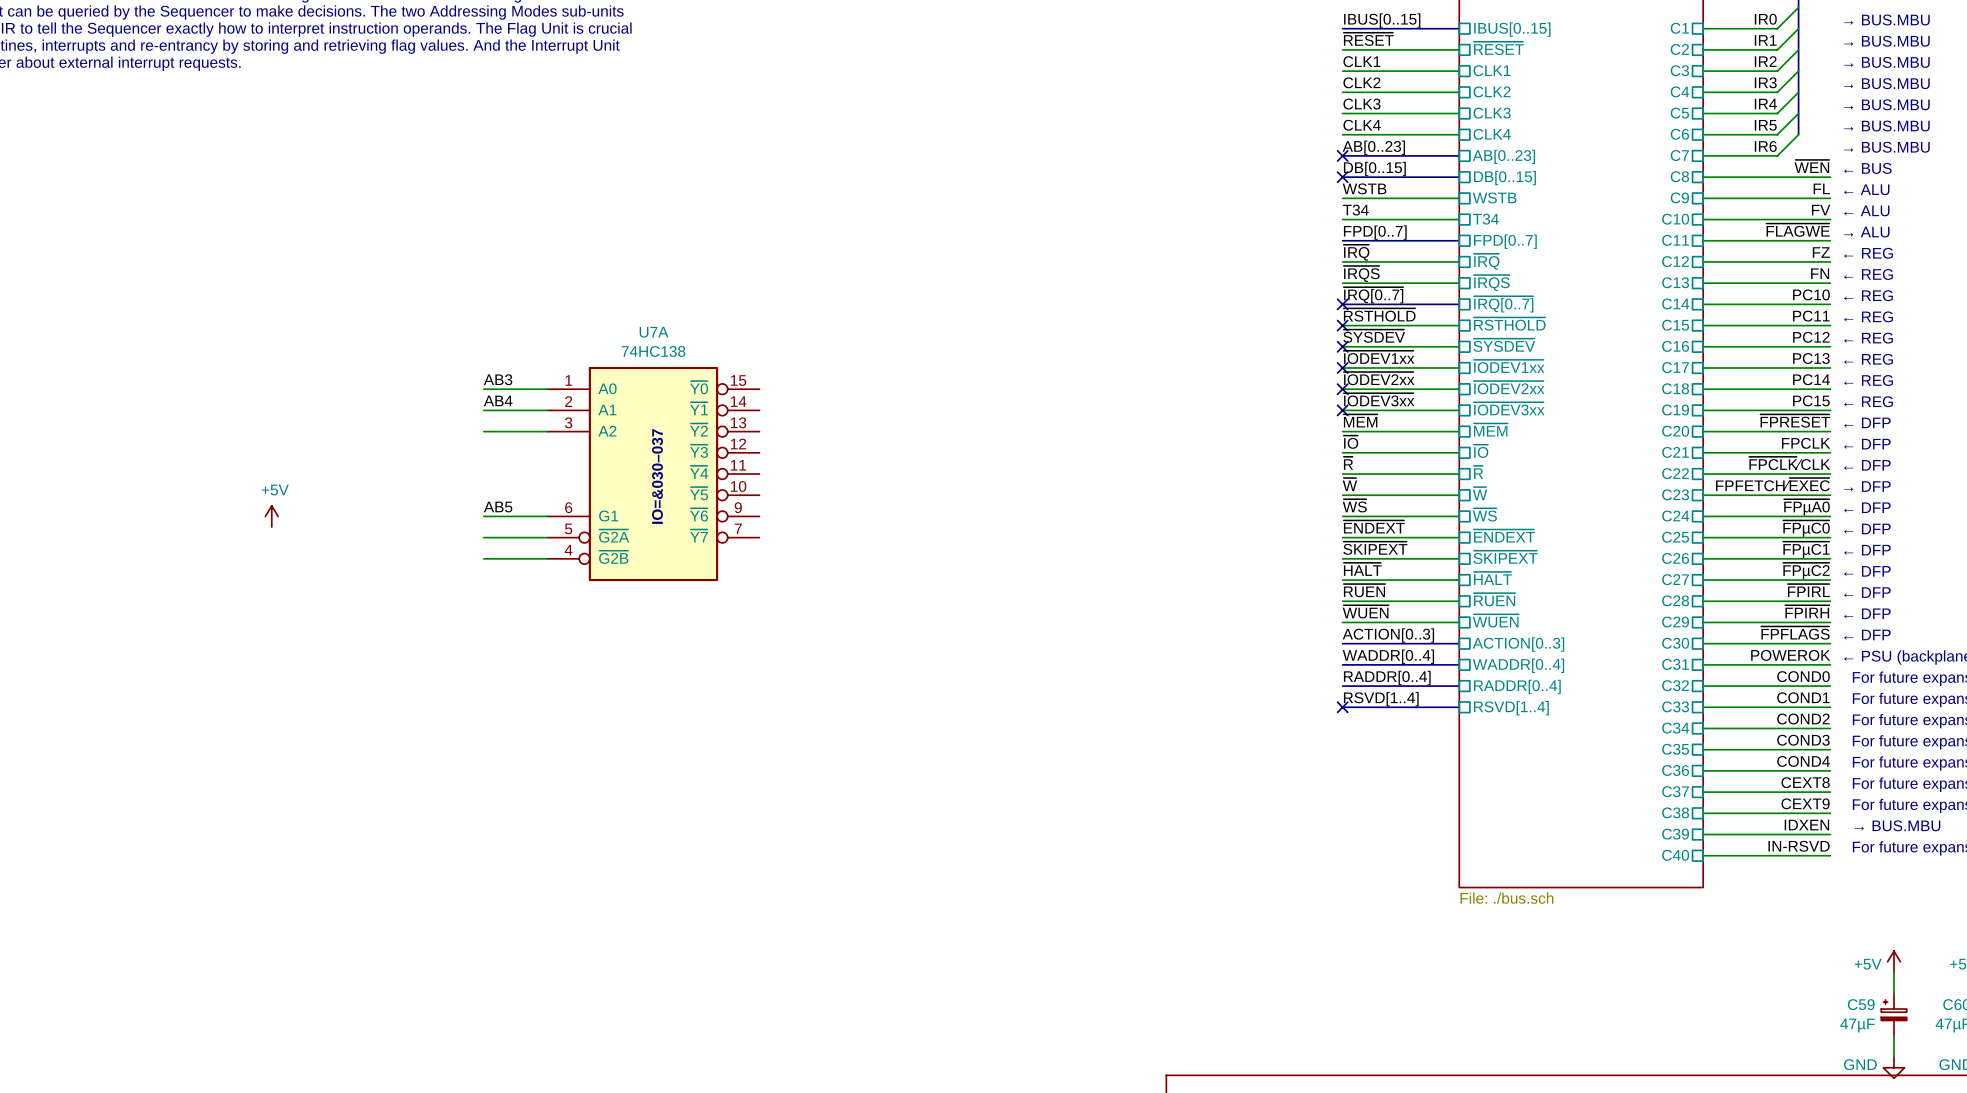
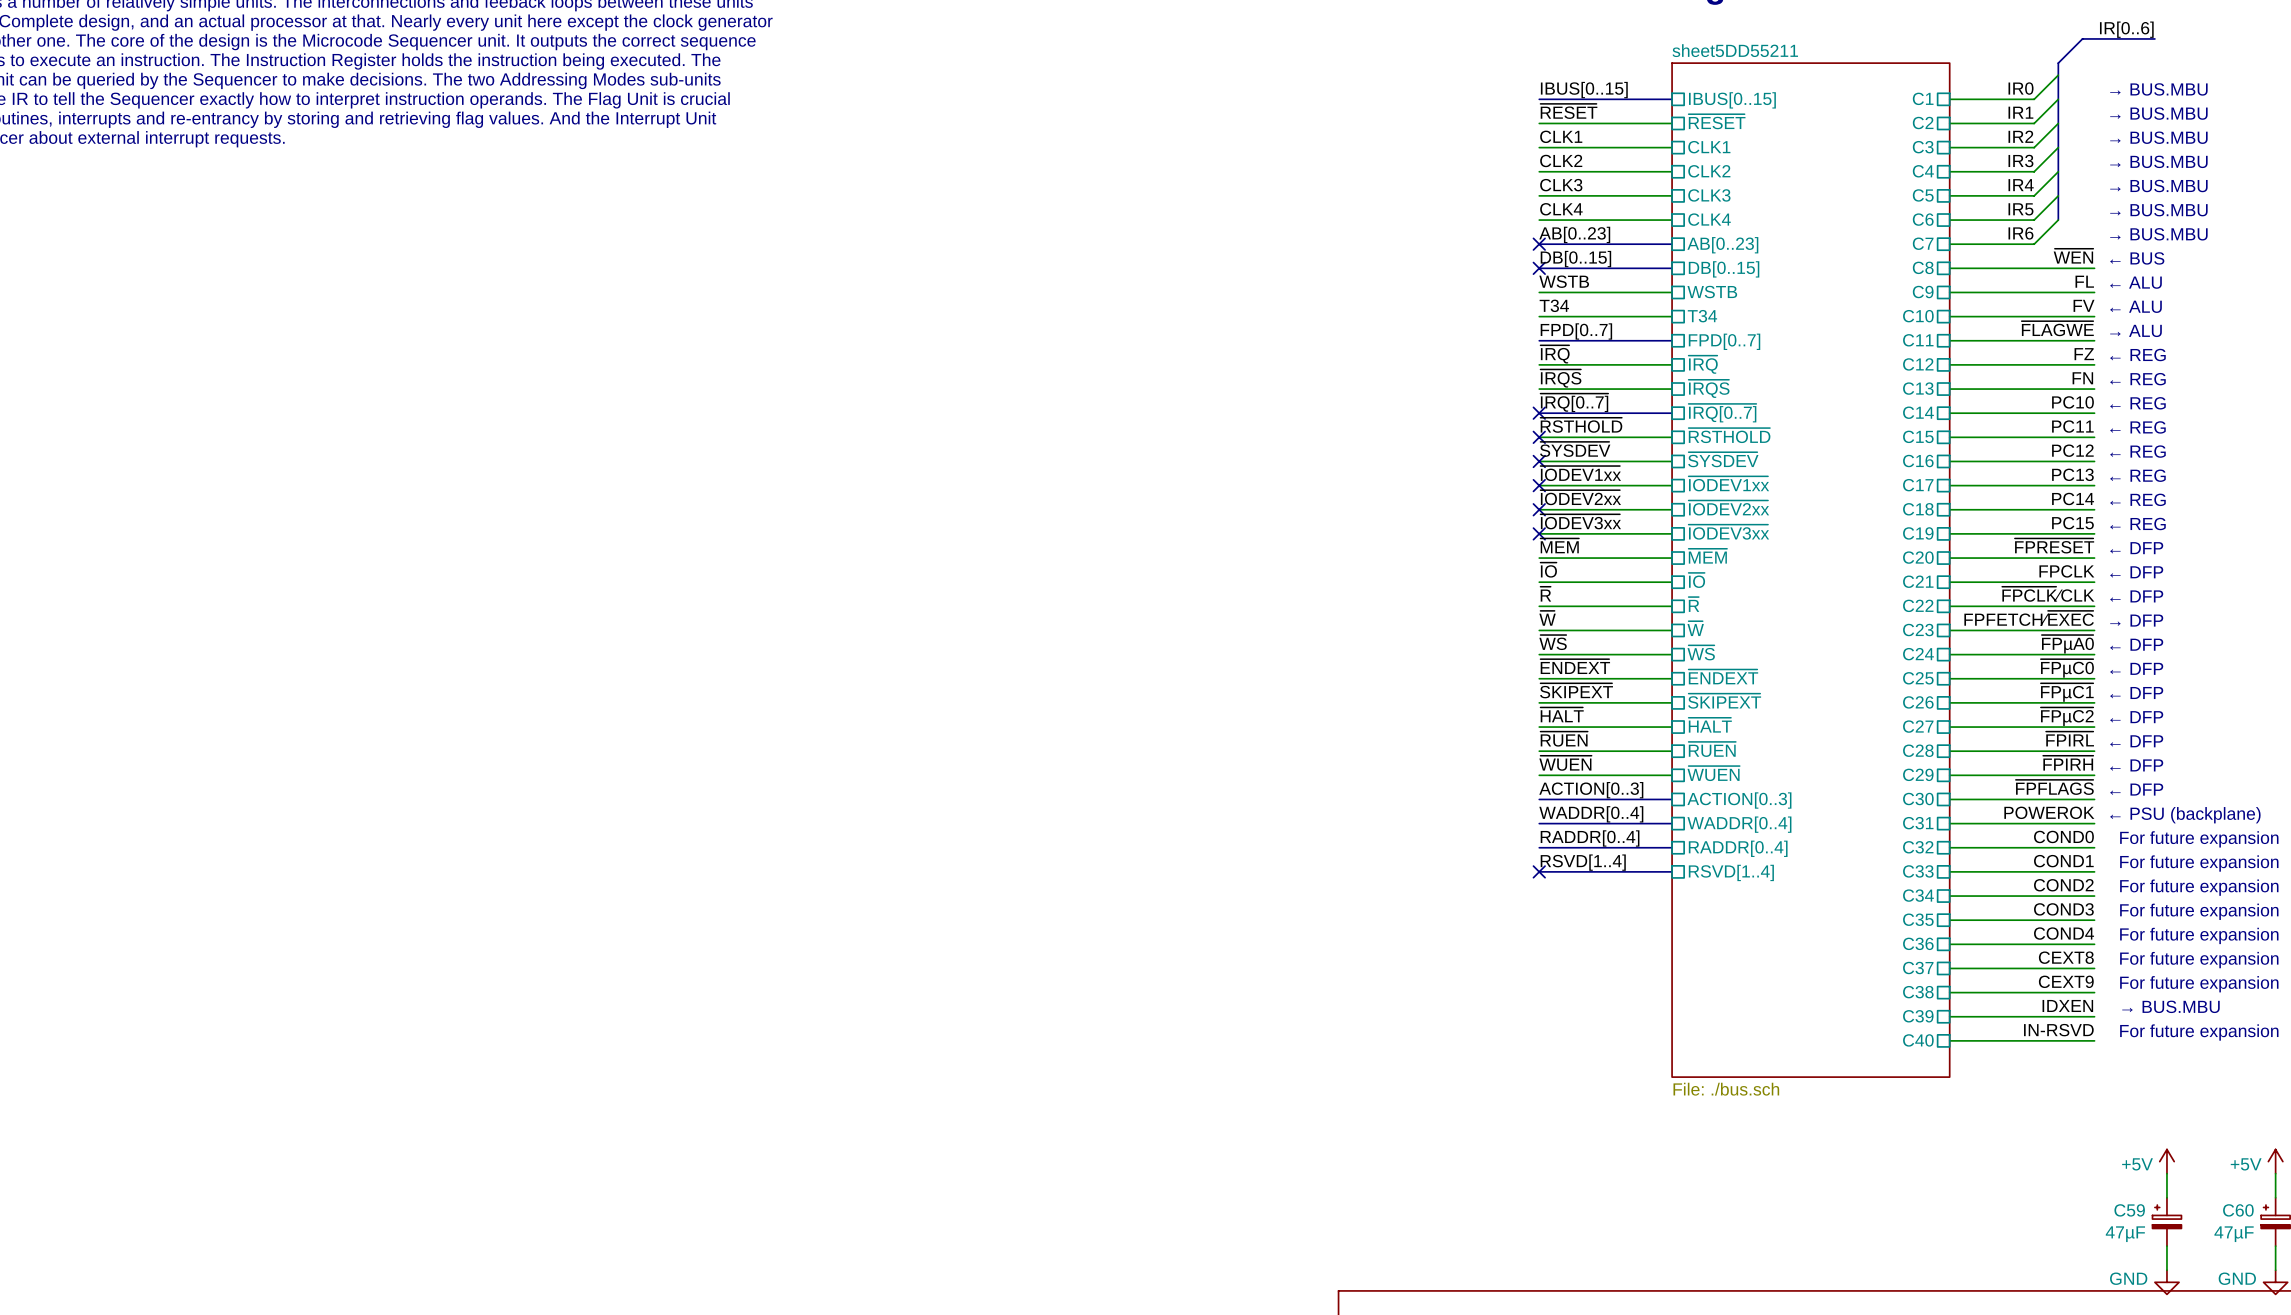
label: AB3 (498, 379) -> none
wire: (483, 389) (547, 389) -> none
label: AB4 (498, 400) -> none
wire: (483, 410) (547, 410) -> none
wire: (483, 431) (547, 431) -> none
U7A: 74HC138 (653, 474) -> none
text: IO=&030–037 (657, 476) -> none
label: AB5 (498, 507) -> none
power symbol: +5V (271, 516) -> none
wire: (483, 516) (547, 516) -> none
wire: (483, 537) (547, 537) -> none
wire: (483, 558) (547, 558) -> none

